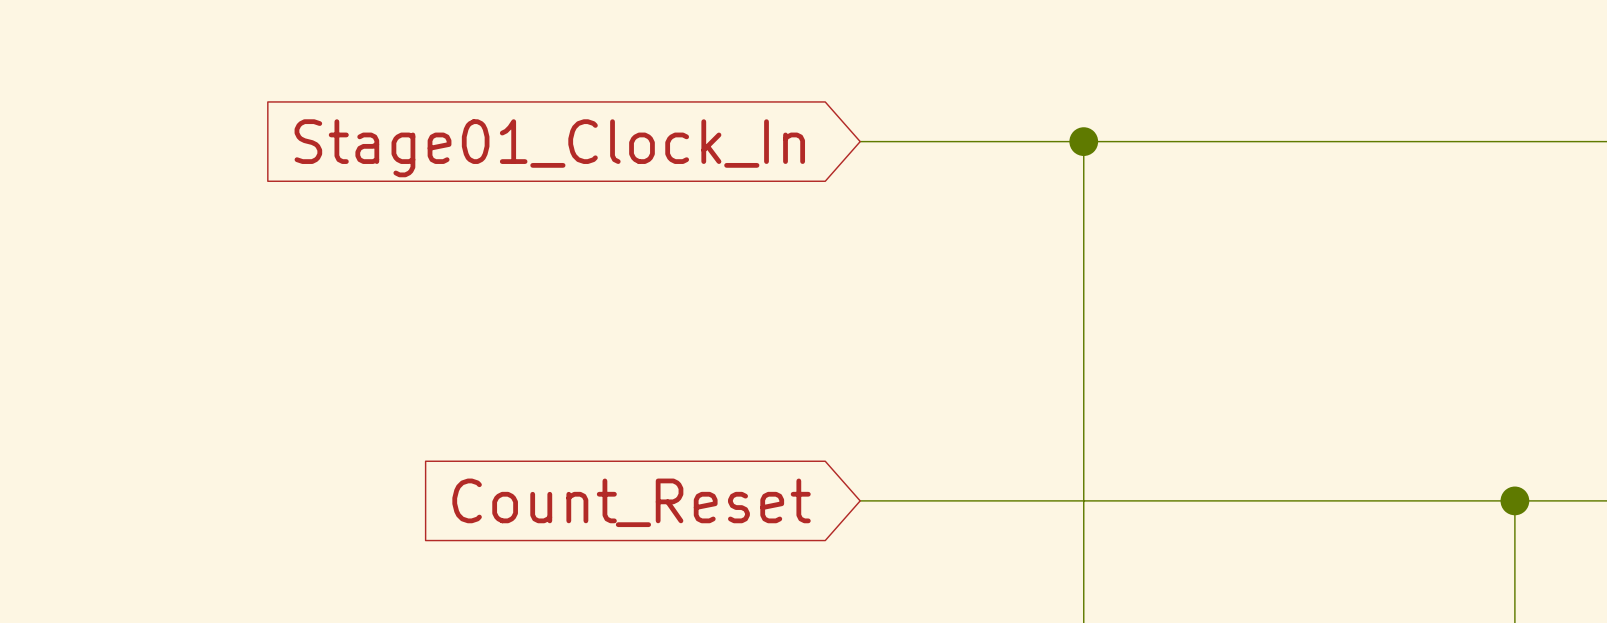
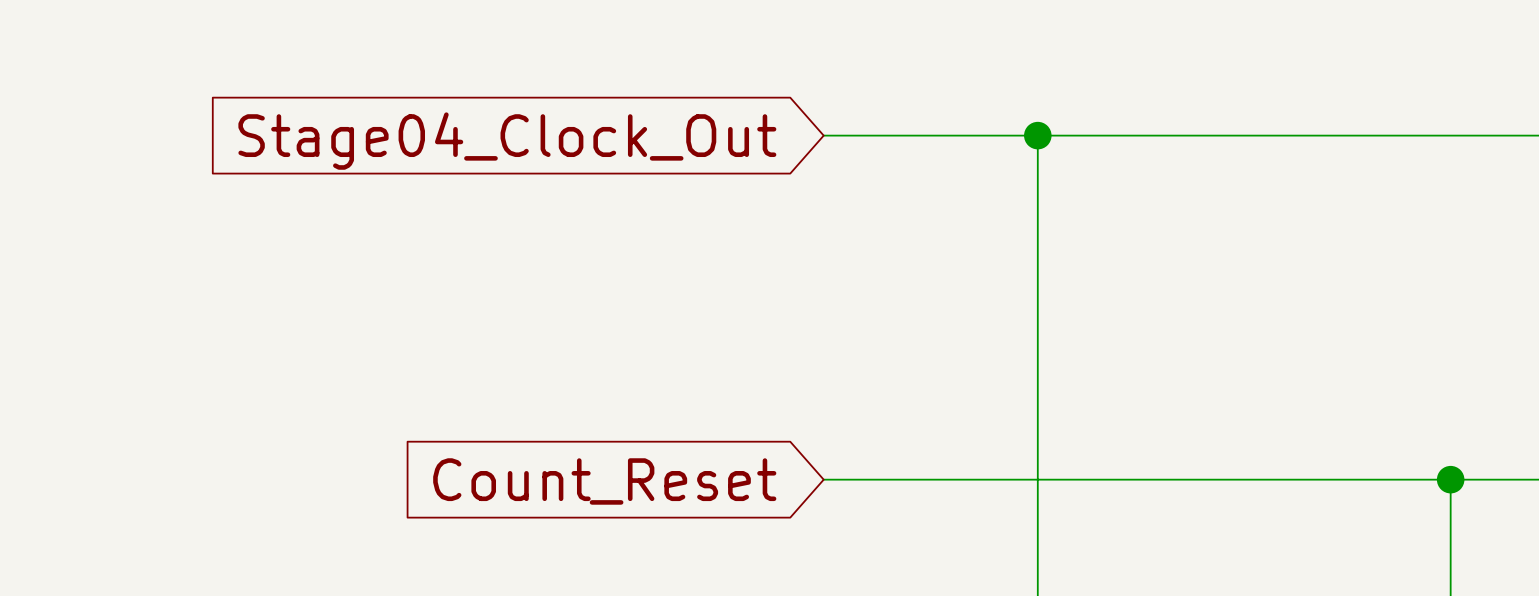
global label: Stage01_Clock_In (549, 148) -> Stage04_Clock_Out (507, 141)

